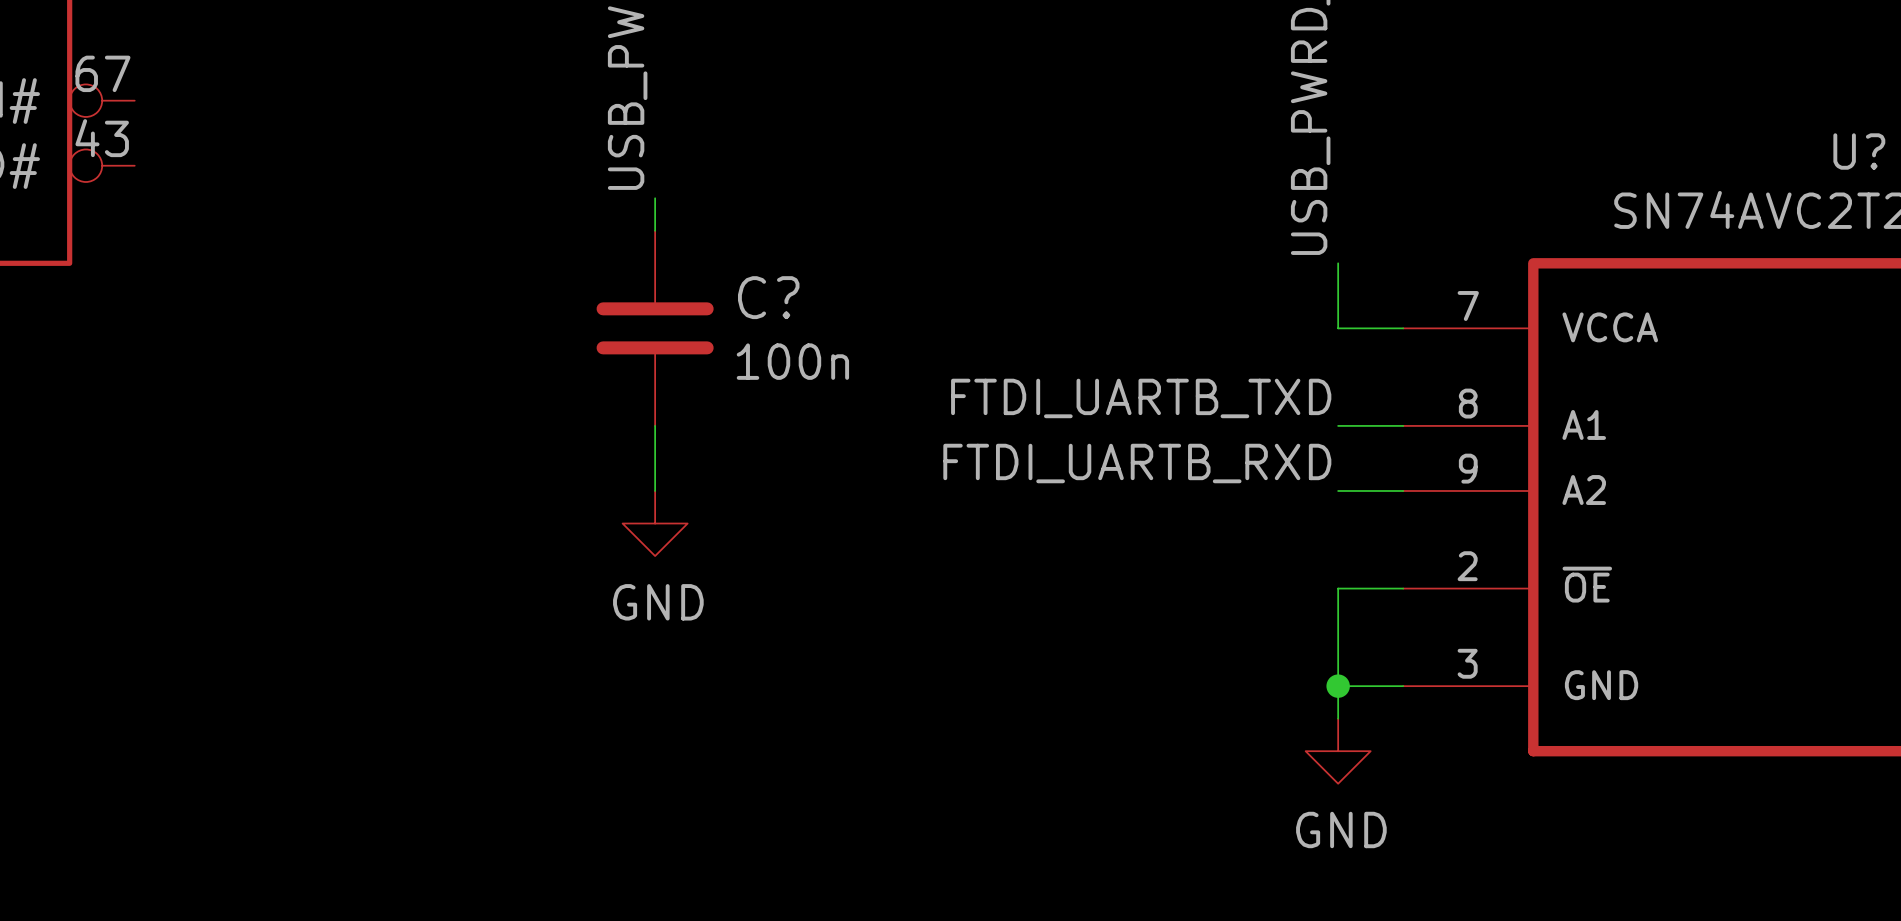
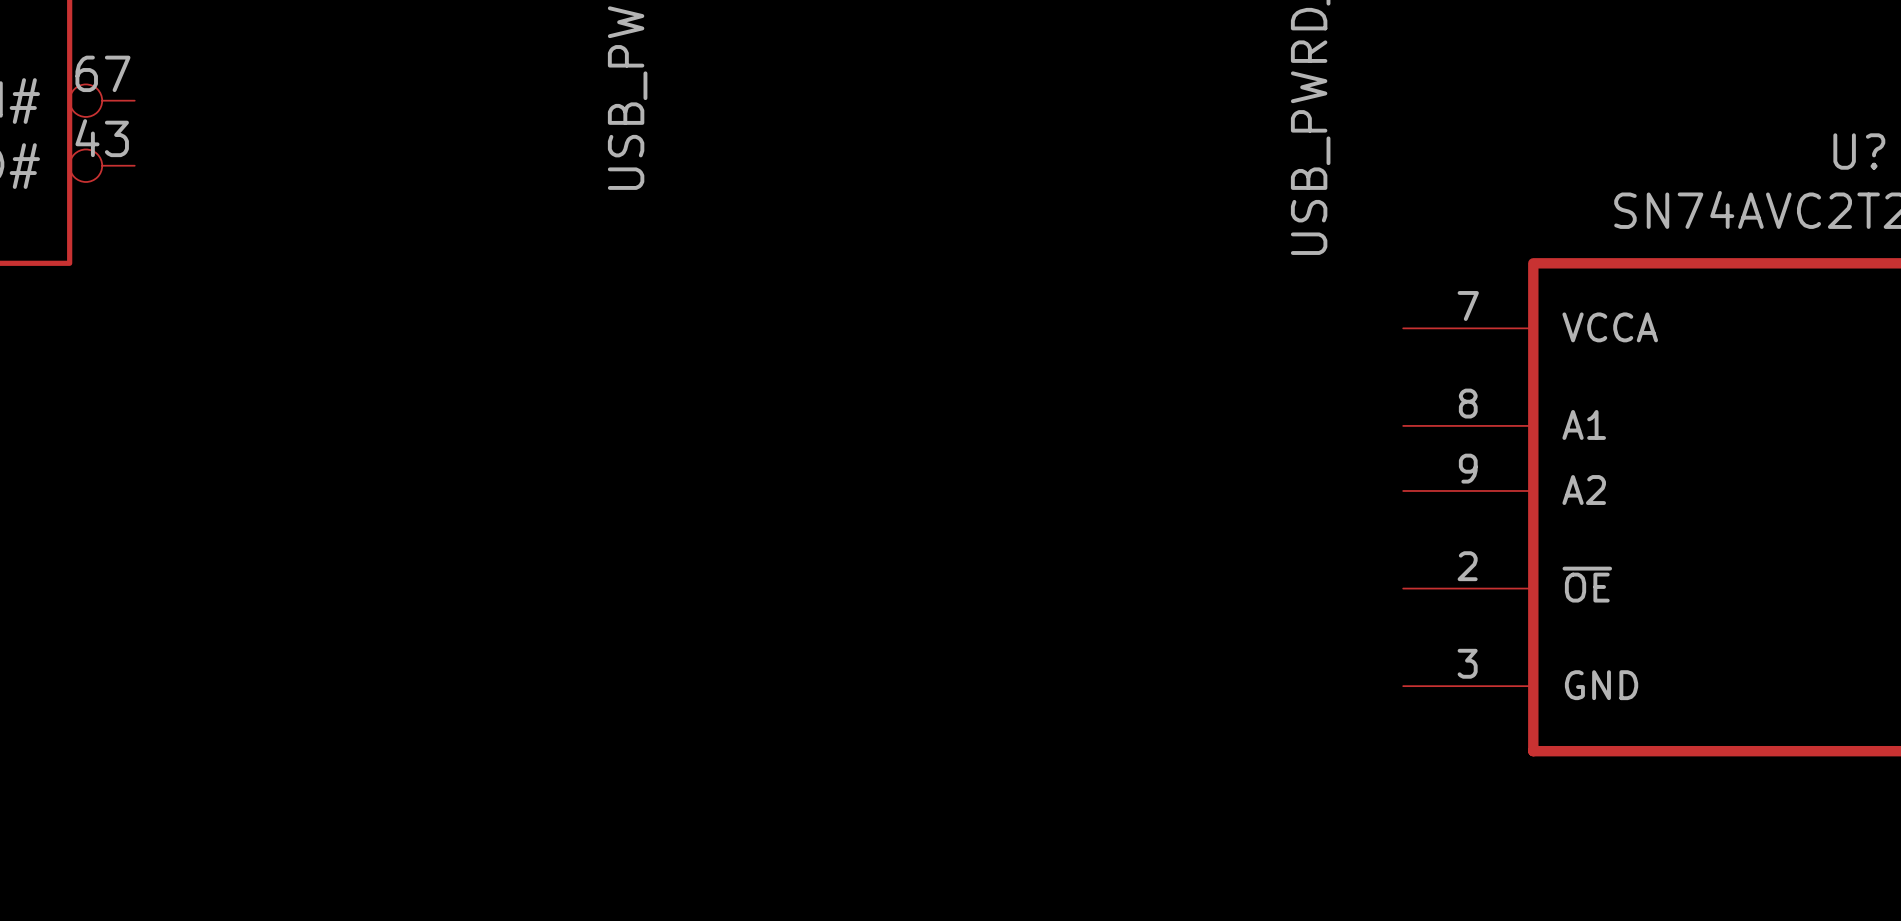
wire: (655, 198) (655, 230) -> none
wire: (1338, 263) (1338, 328) (1403, 328) -> none
C?: (655, 328) -> none
label: FTDI_UARTB_TXD (1141, 398) -> none
wire: (655, 425) (655, 490) -> none
wire: (1338, 425) (1403, 425) -> none
label: FTDI_UARTB_RXD (1137, 463) -> none
wire: (1338, 490) (1403, 490) -> none
power symbol: GND (655, 523) -> none
wire: (1403, 588) (1338, 588) (1338, 718) -> none
wire: (1338, 686) (1403, 686) -> none
junction: (1338, 686) -> none
power symbol: GND (1338, 751) -> none

